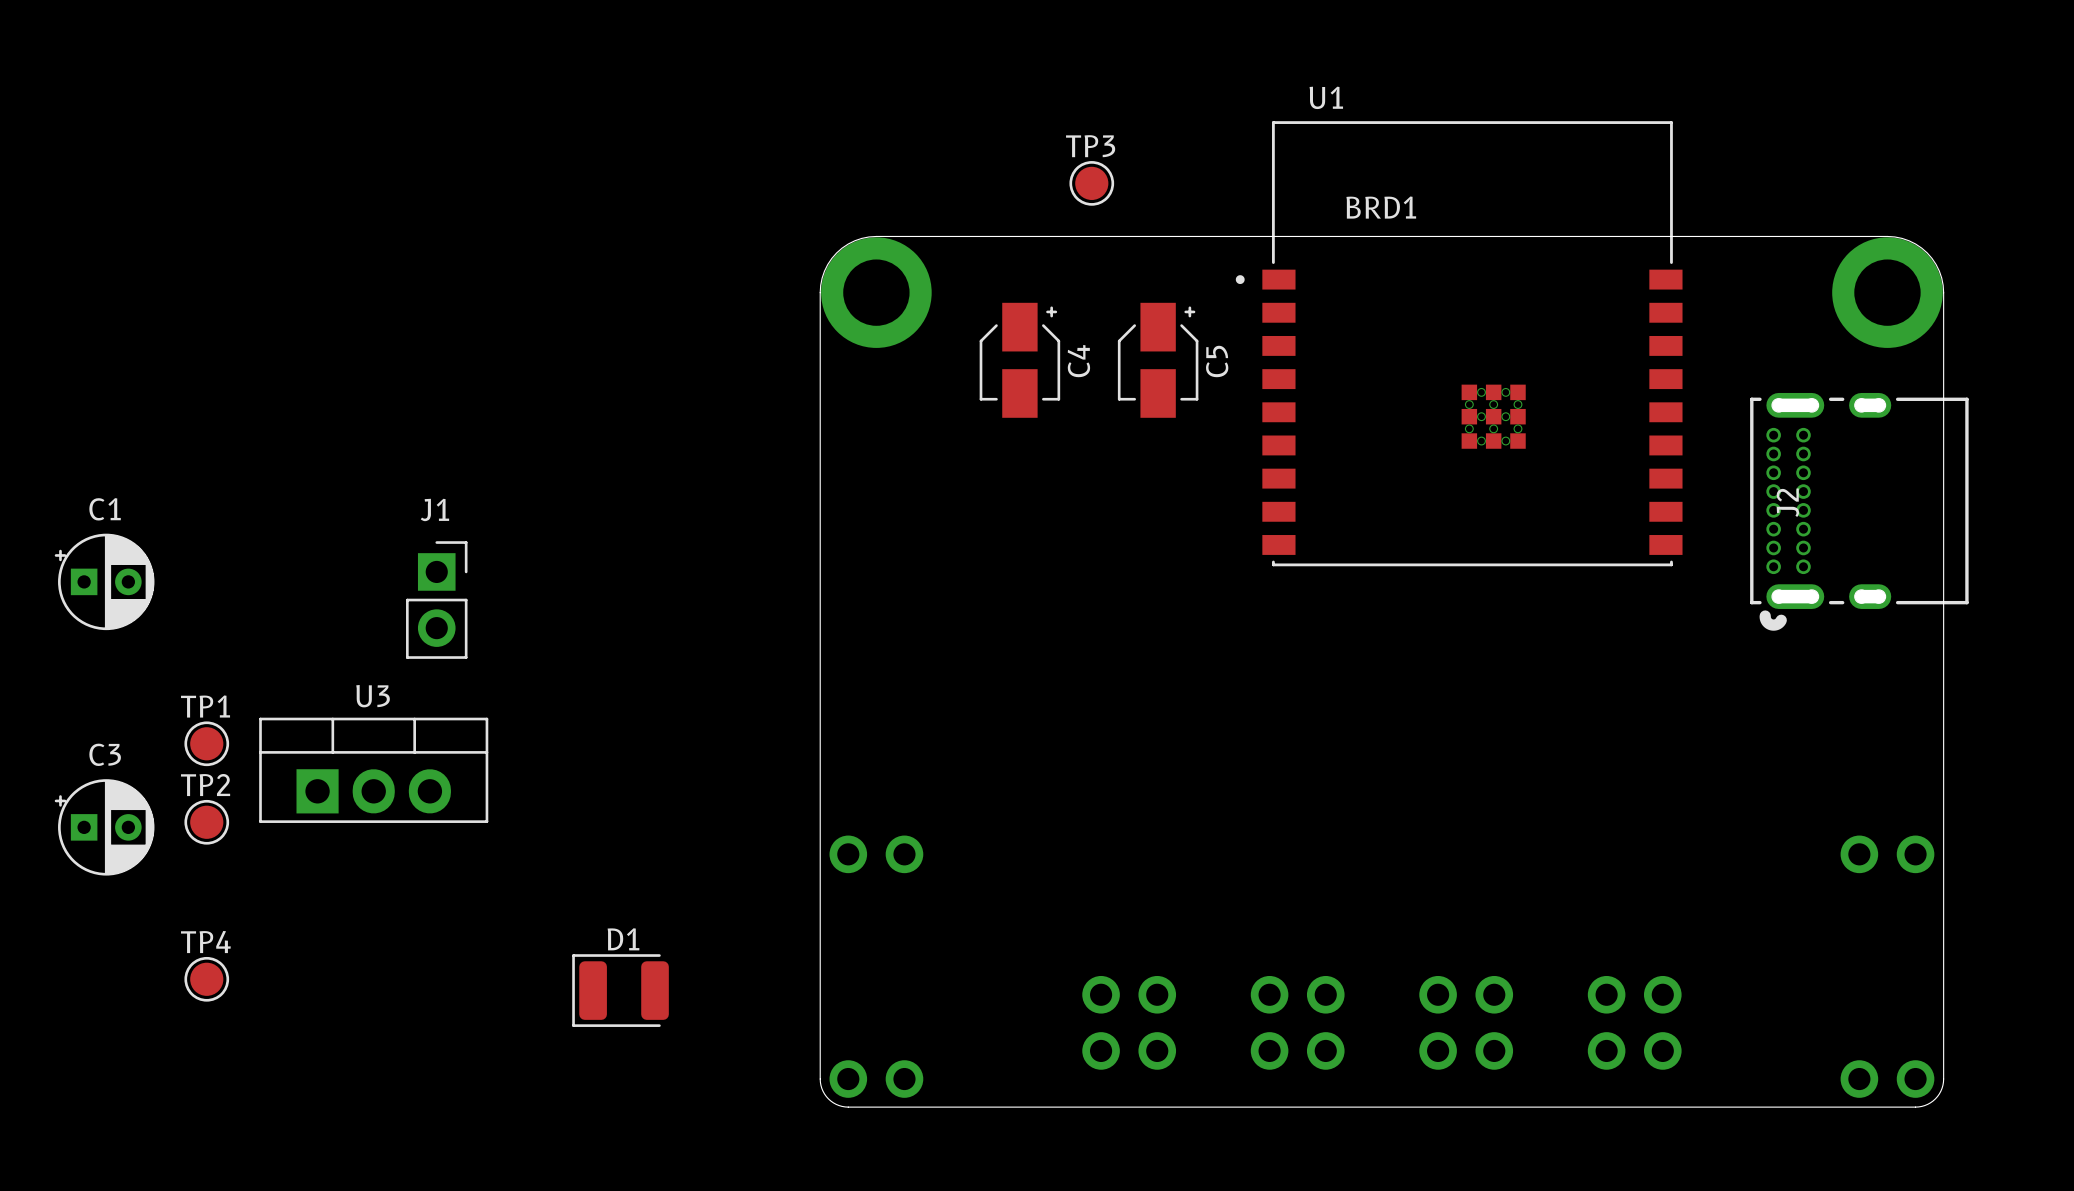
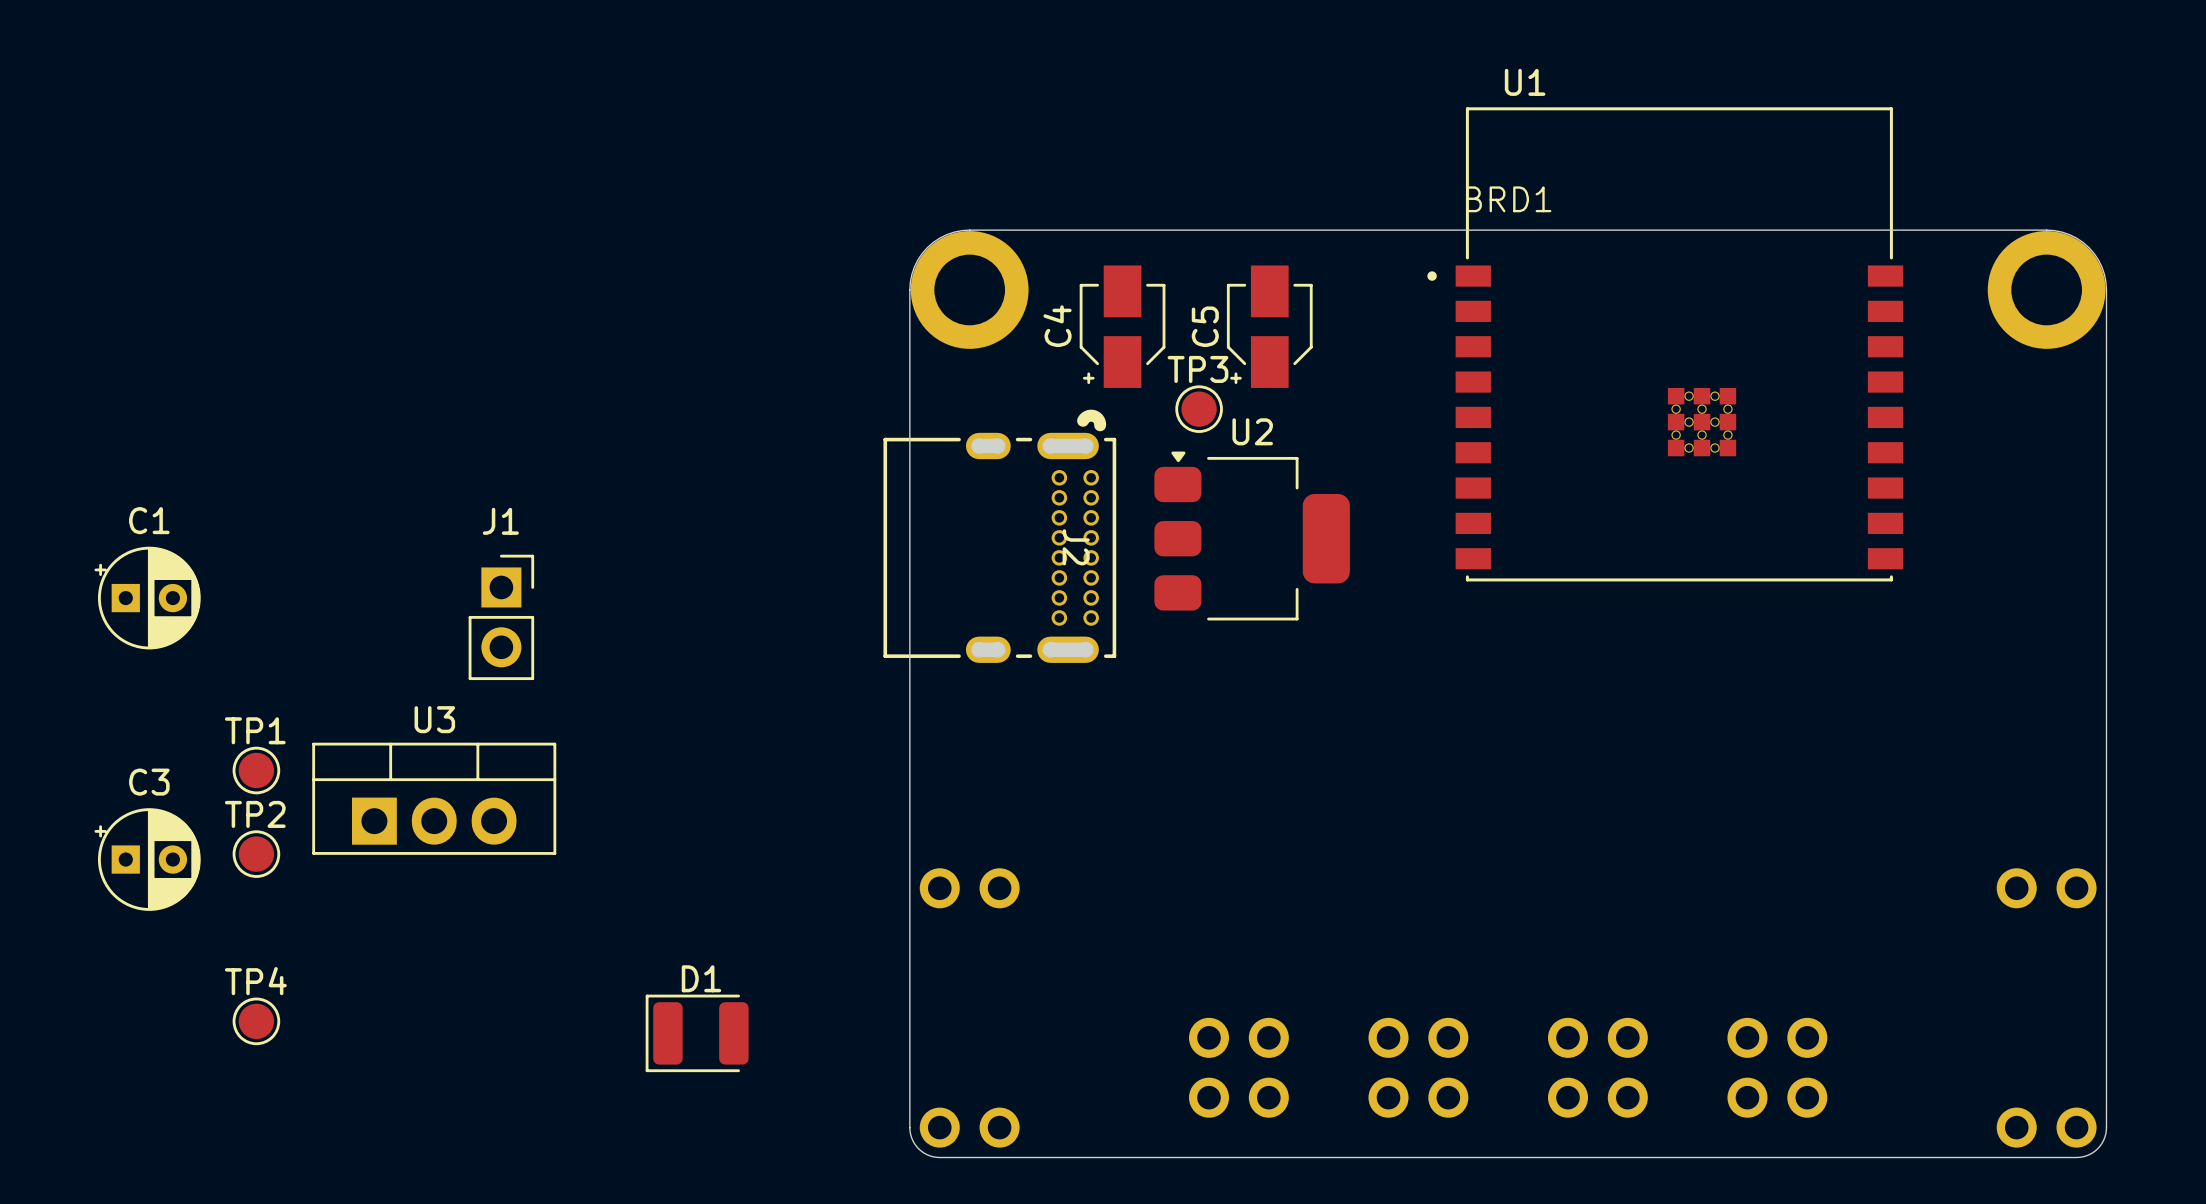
TP3 position: (1091, 183) -> (1199, 409)
U1 position: (1459, 343) -> (1665, 344)
C4 rotation: 0° (1019, 360) -> 180° (1122, 326)
C5 rotation: 0° (1158, 360) -> 180° (1269, 326)
J2 rotation: 0° (1859, 511) -> 180° (999, 536)
J2 position: (1859, 511) -> (999, 536)
U2: none -> (1252, 535)

